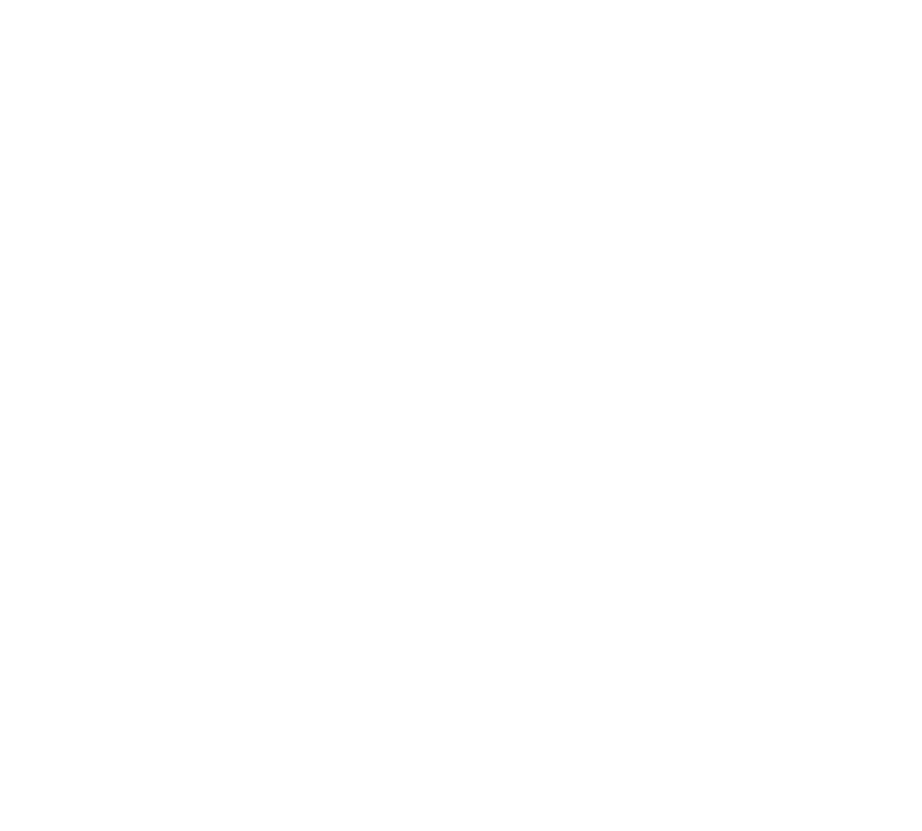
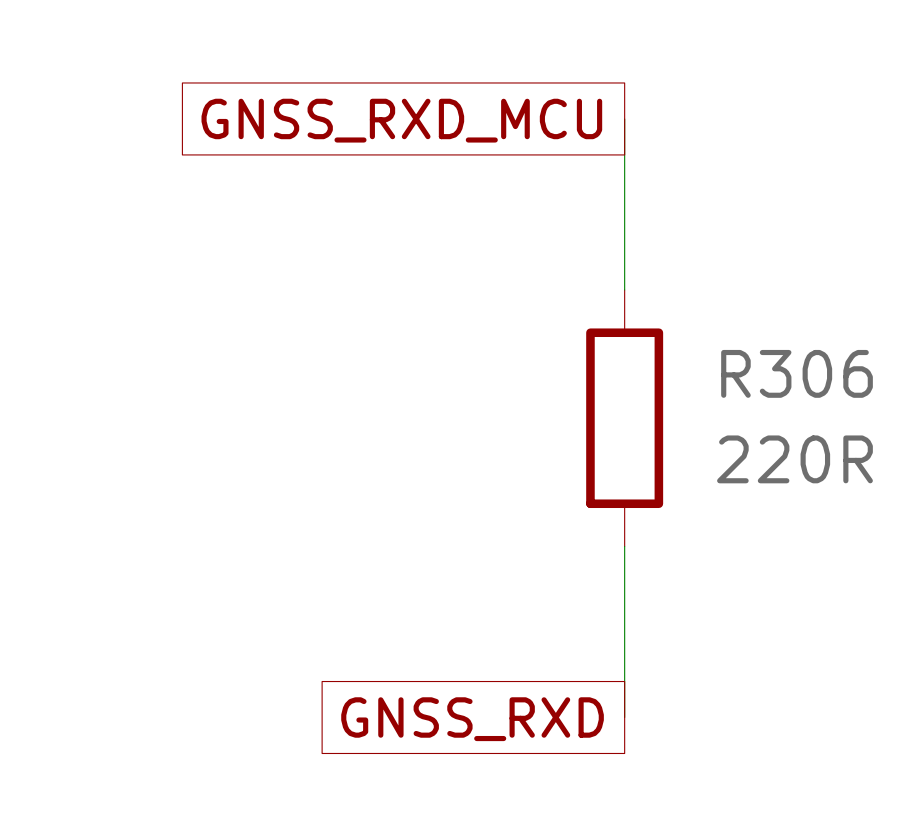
wire: none -> (624, 118) (624, 289)
global label: none -> GNSS_RXD_MCU (401, 120)
R306: none -> 220R (624, 418)
wire: none -> (624, 546) (624, 717)
global label: none -> GNSS_RXD (472, 719)

